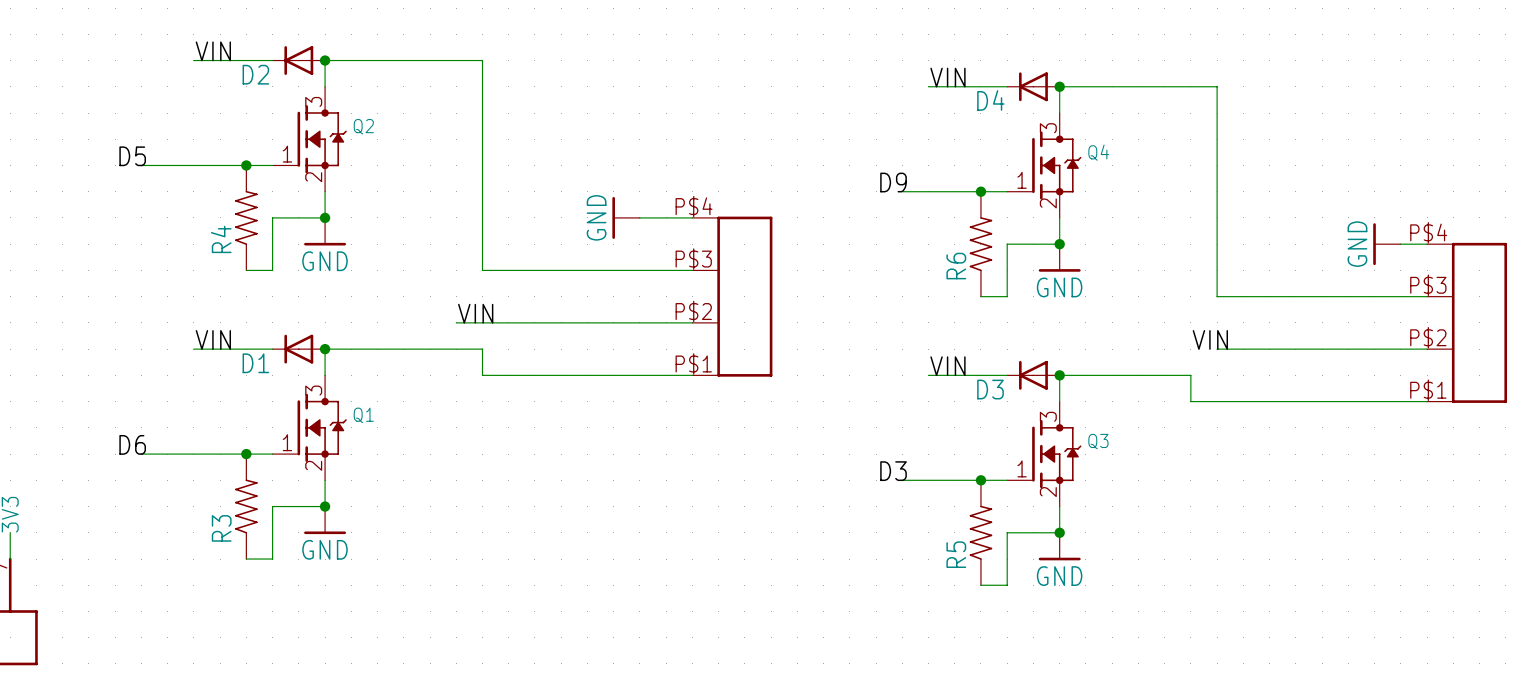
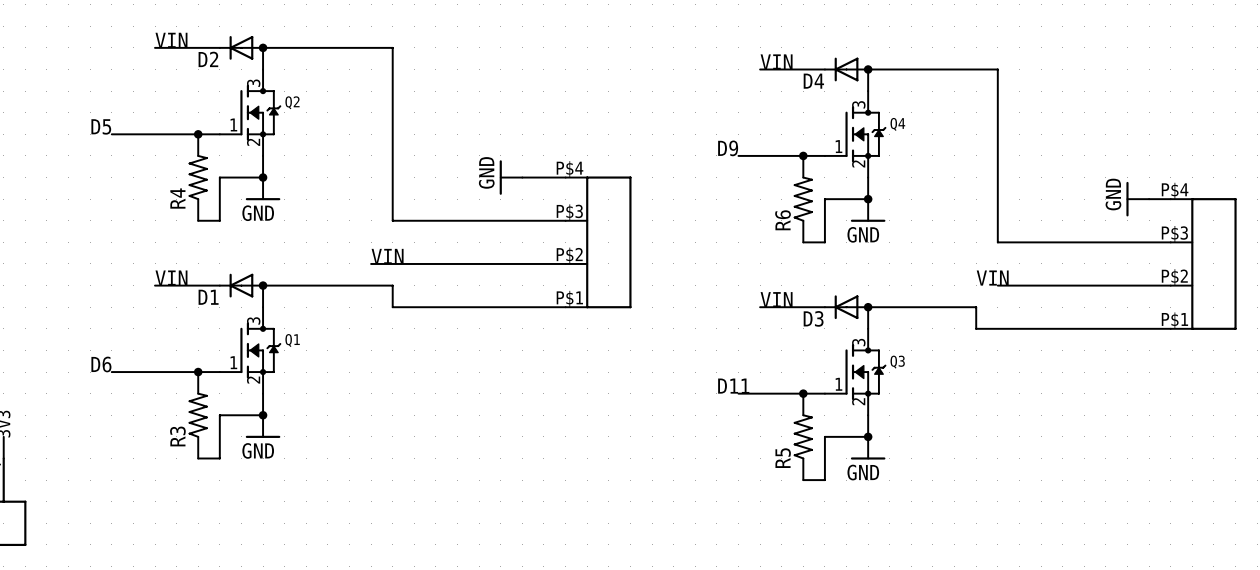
label: D3 (893, 471) -> D11 (733, 386)

